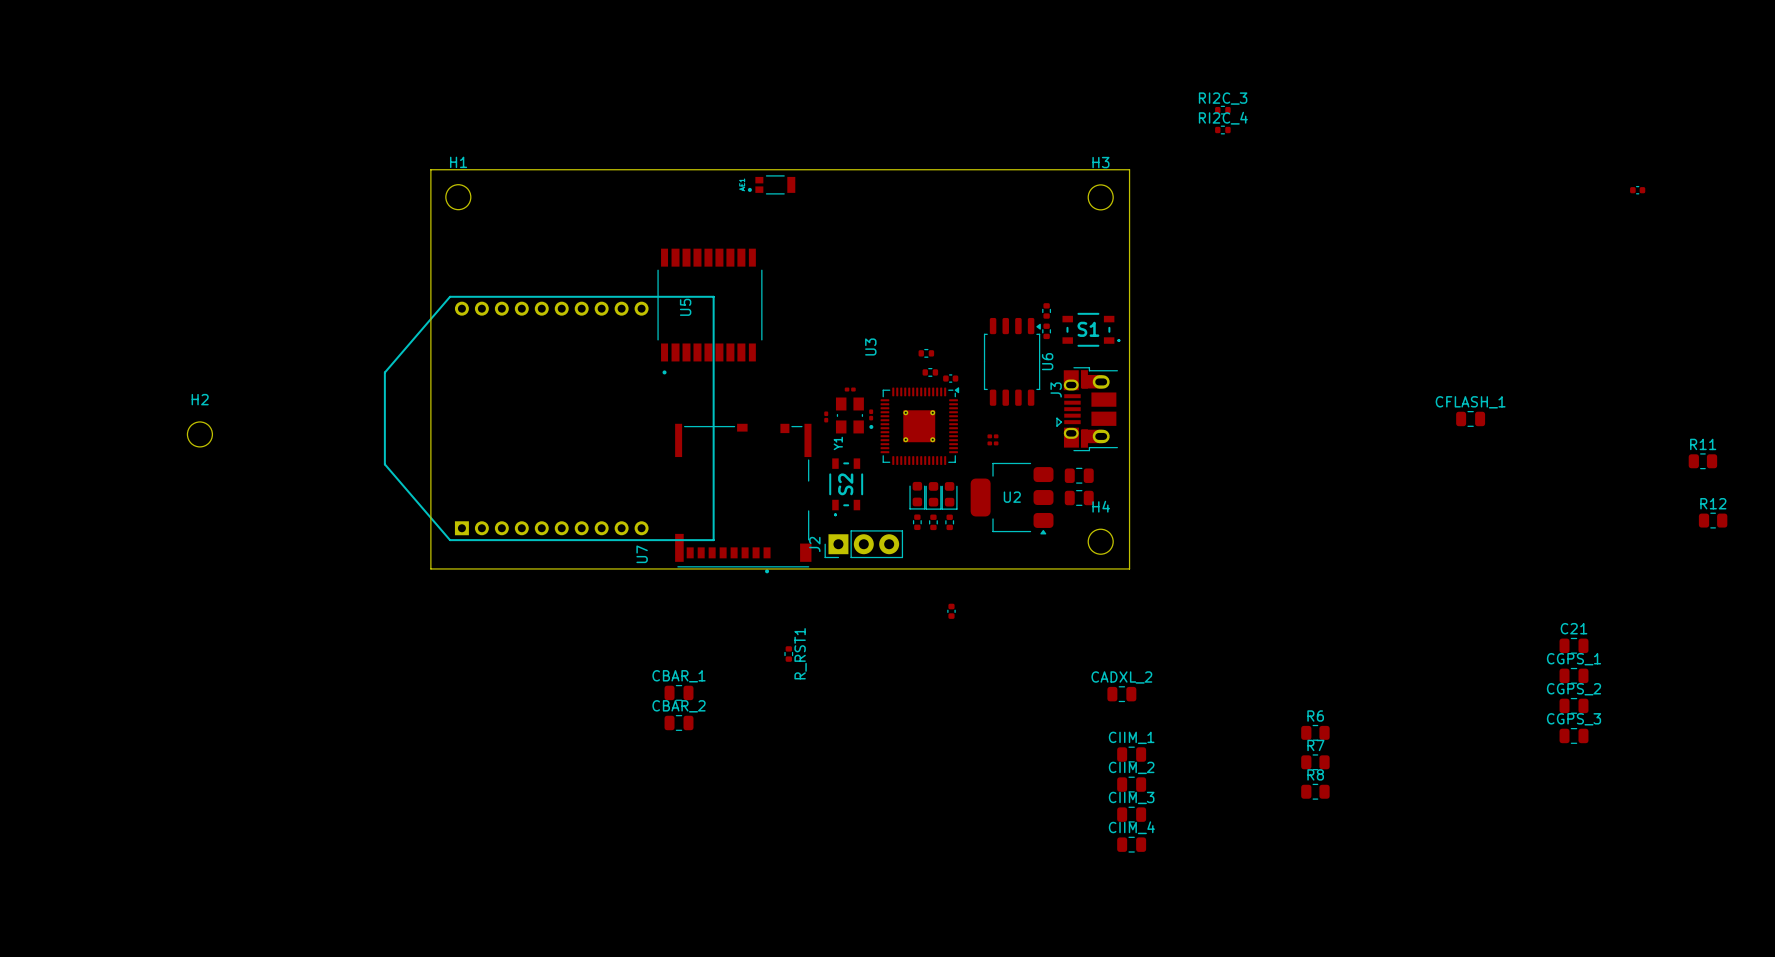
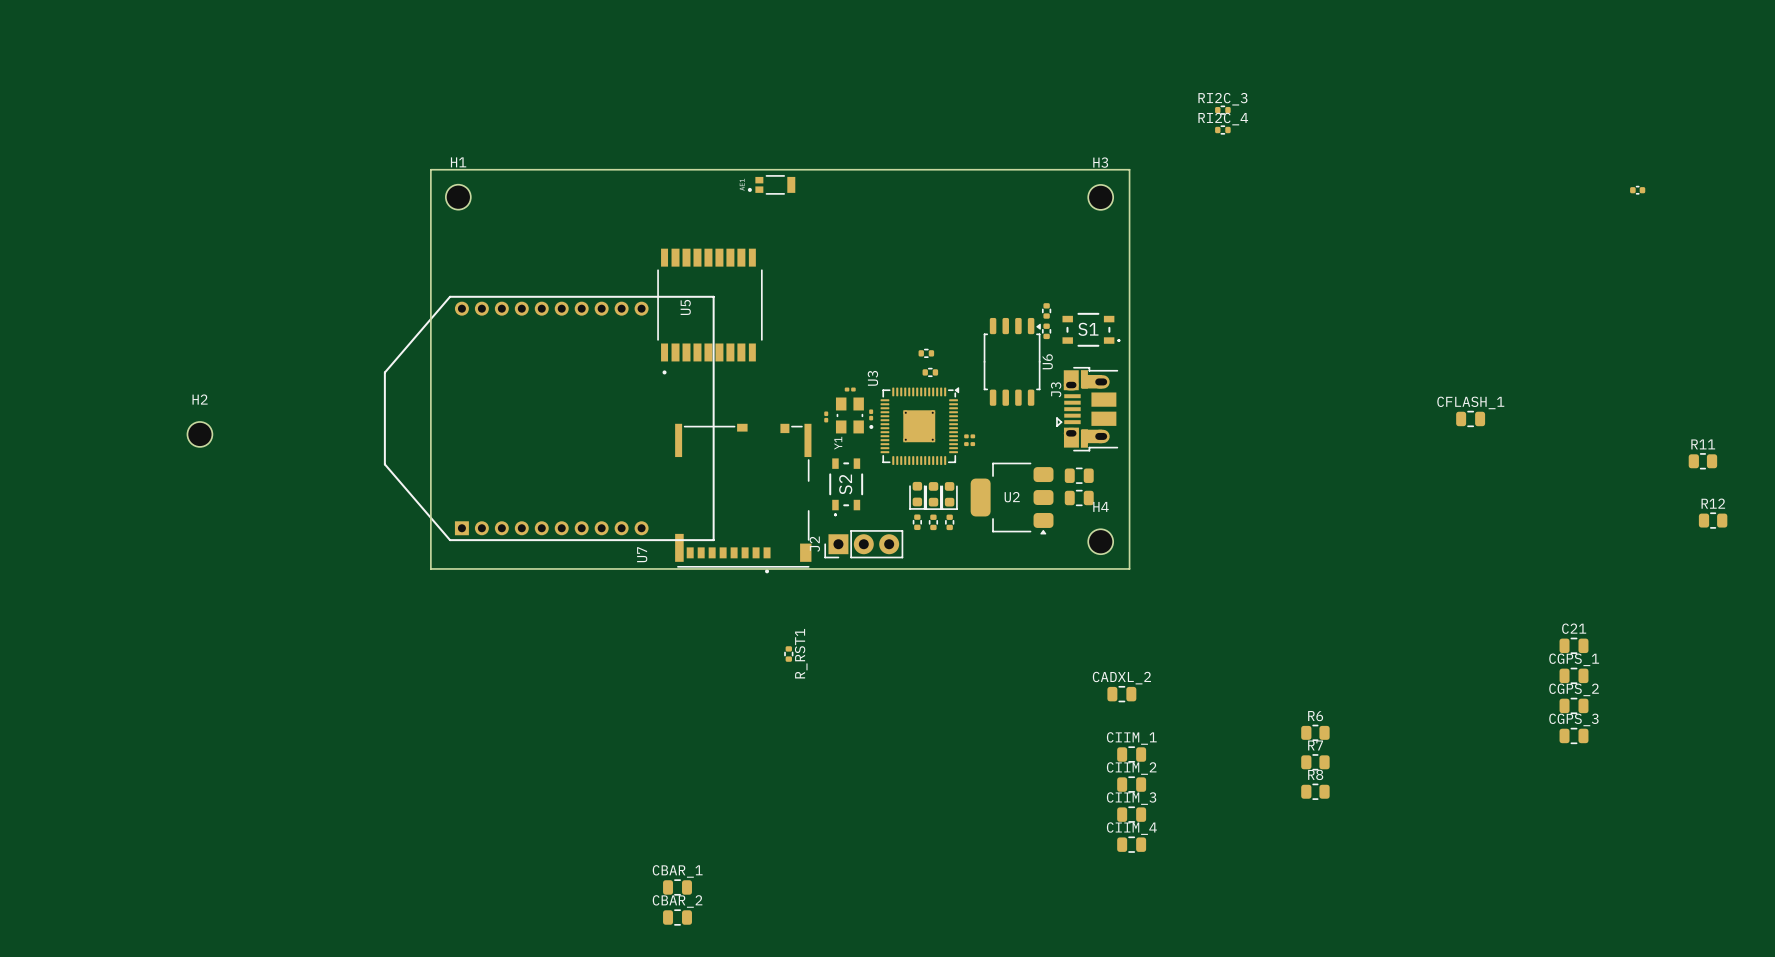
U3 name position: U3 (870, 346) -> U3 (872, 378)
part: (950, 378) -> none
part: none -> (969, 436)
part: (992, 436) -> none
part: (992, 443) -> none
part: none -> (969, 444)
part: (951, 611) -> none
CBAR_1 position: (679, 692) -> (677, 887)
CBAR_2 position: (679, 722) -> (677, 917)

